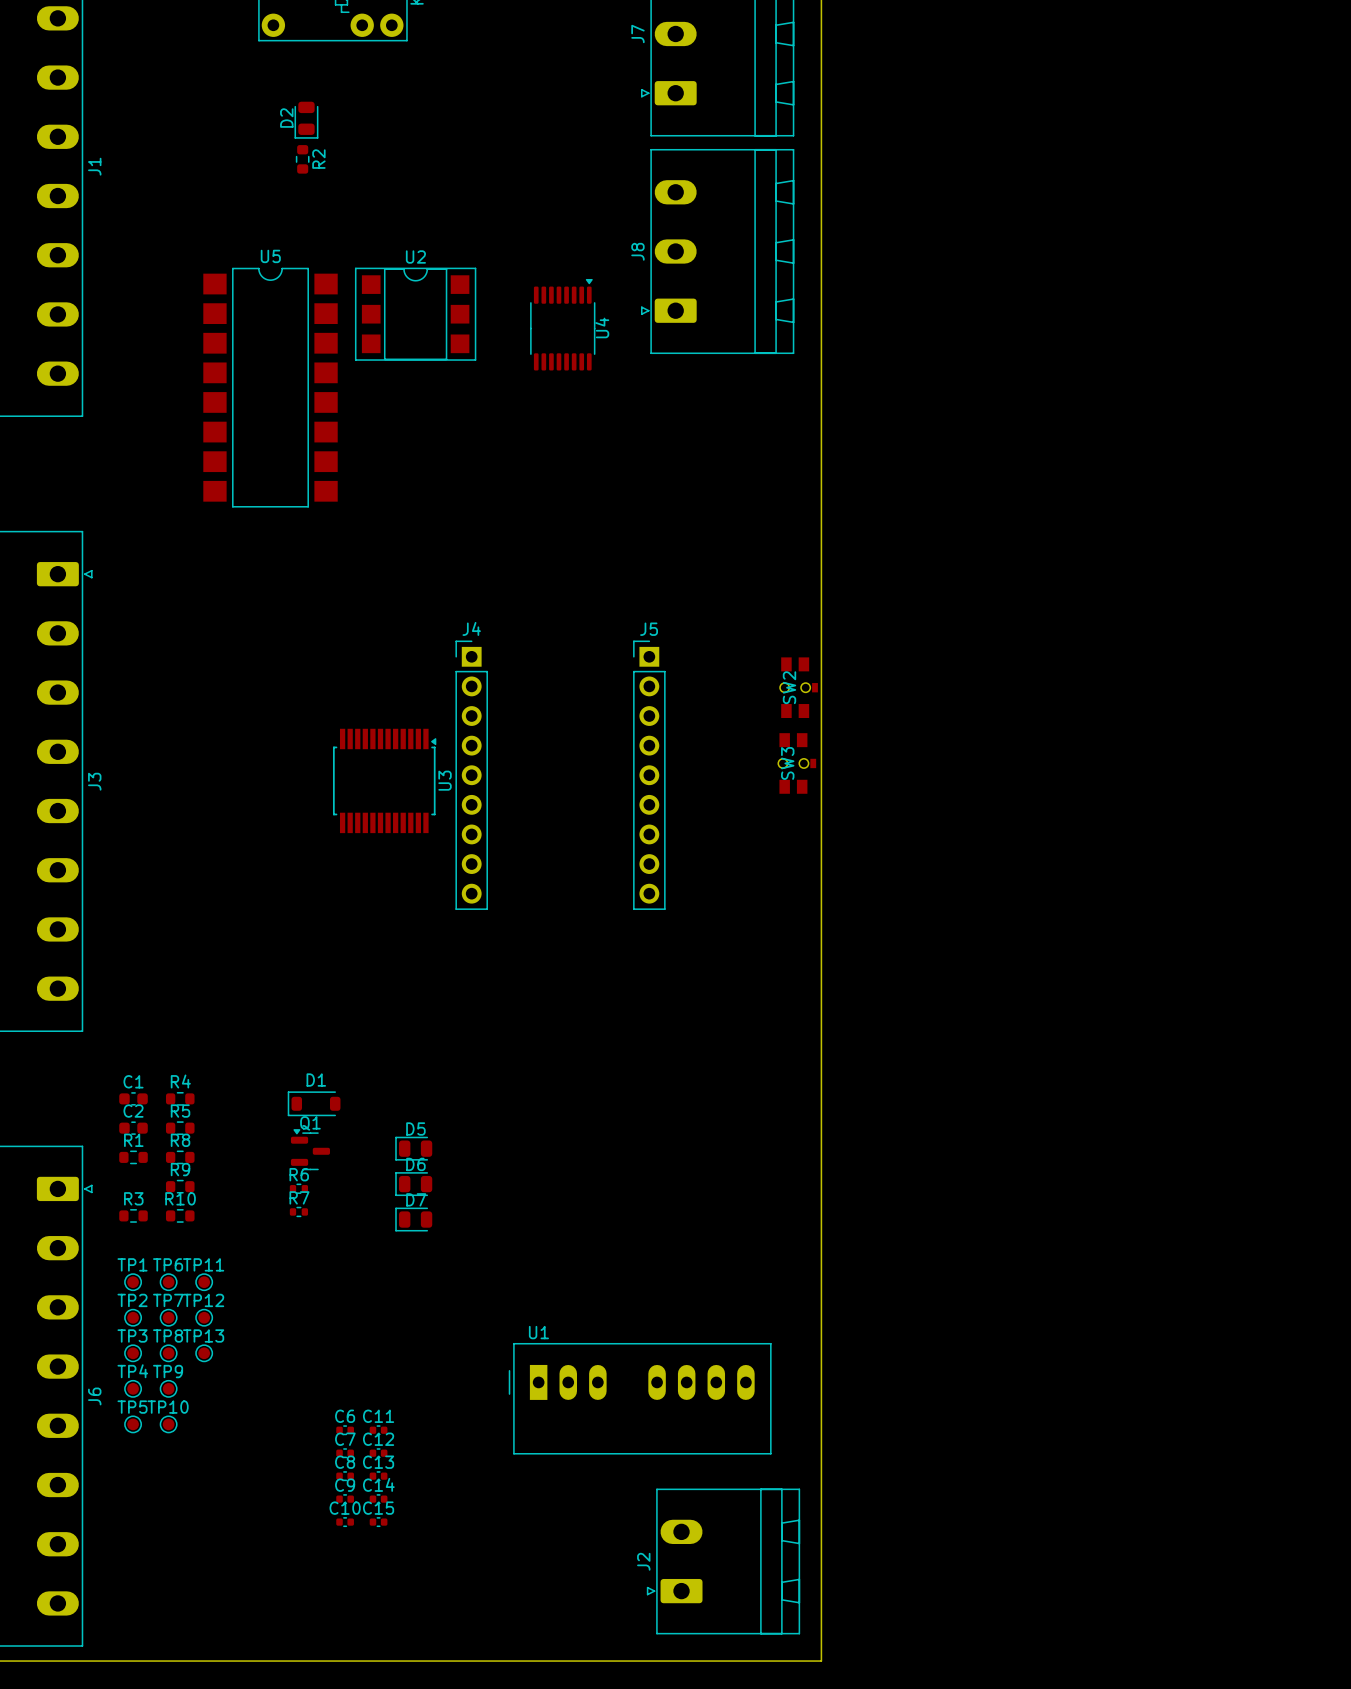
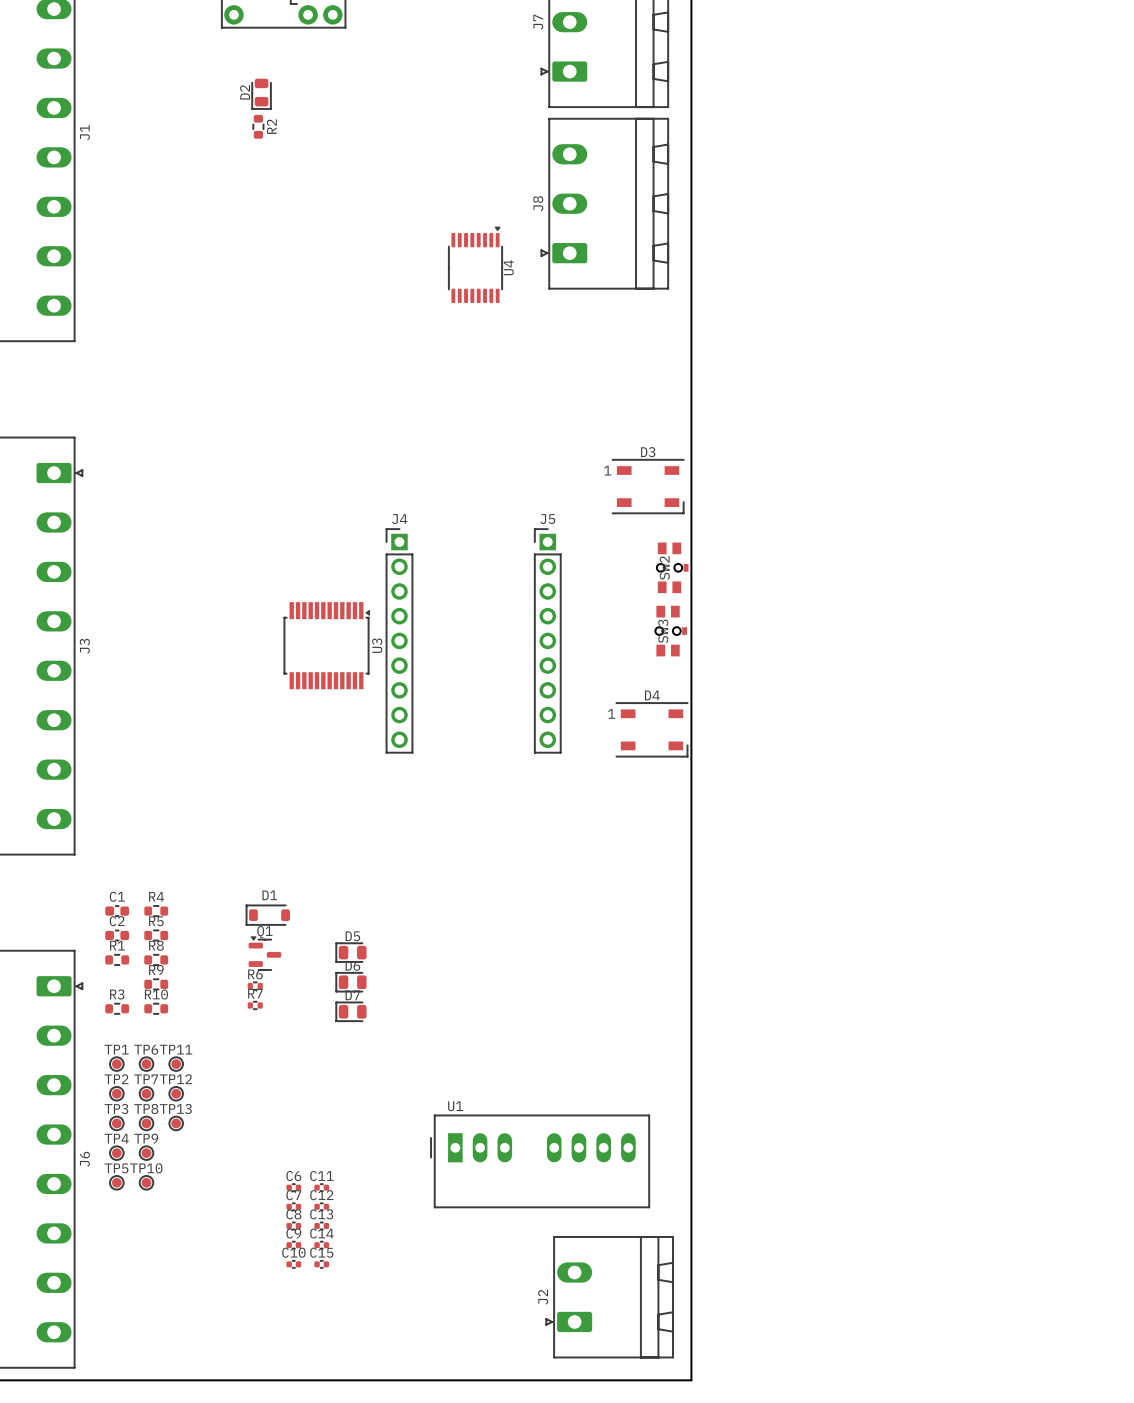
U2: (415, 314) -> none
U5: (270, 387) -> none
D3: none -> (648, 486)
D4: none -> (651, 729)

